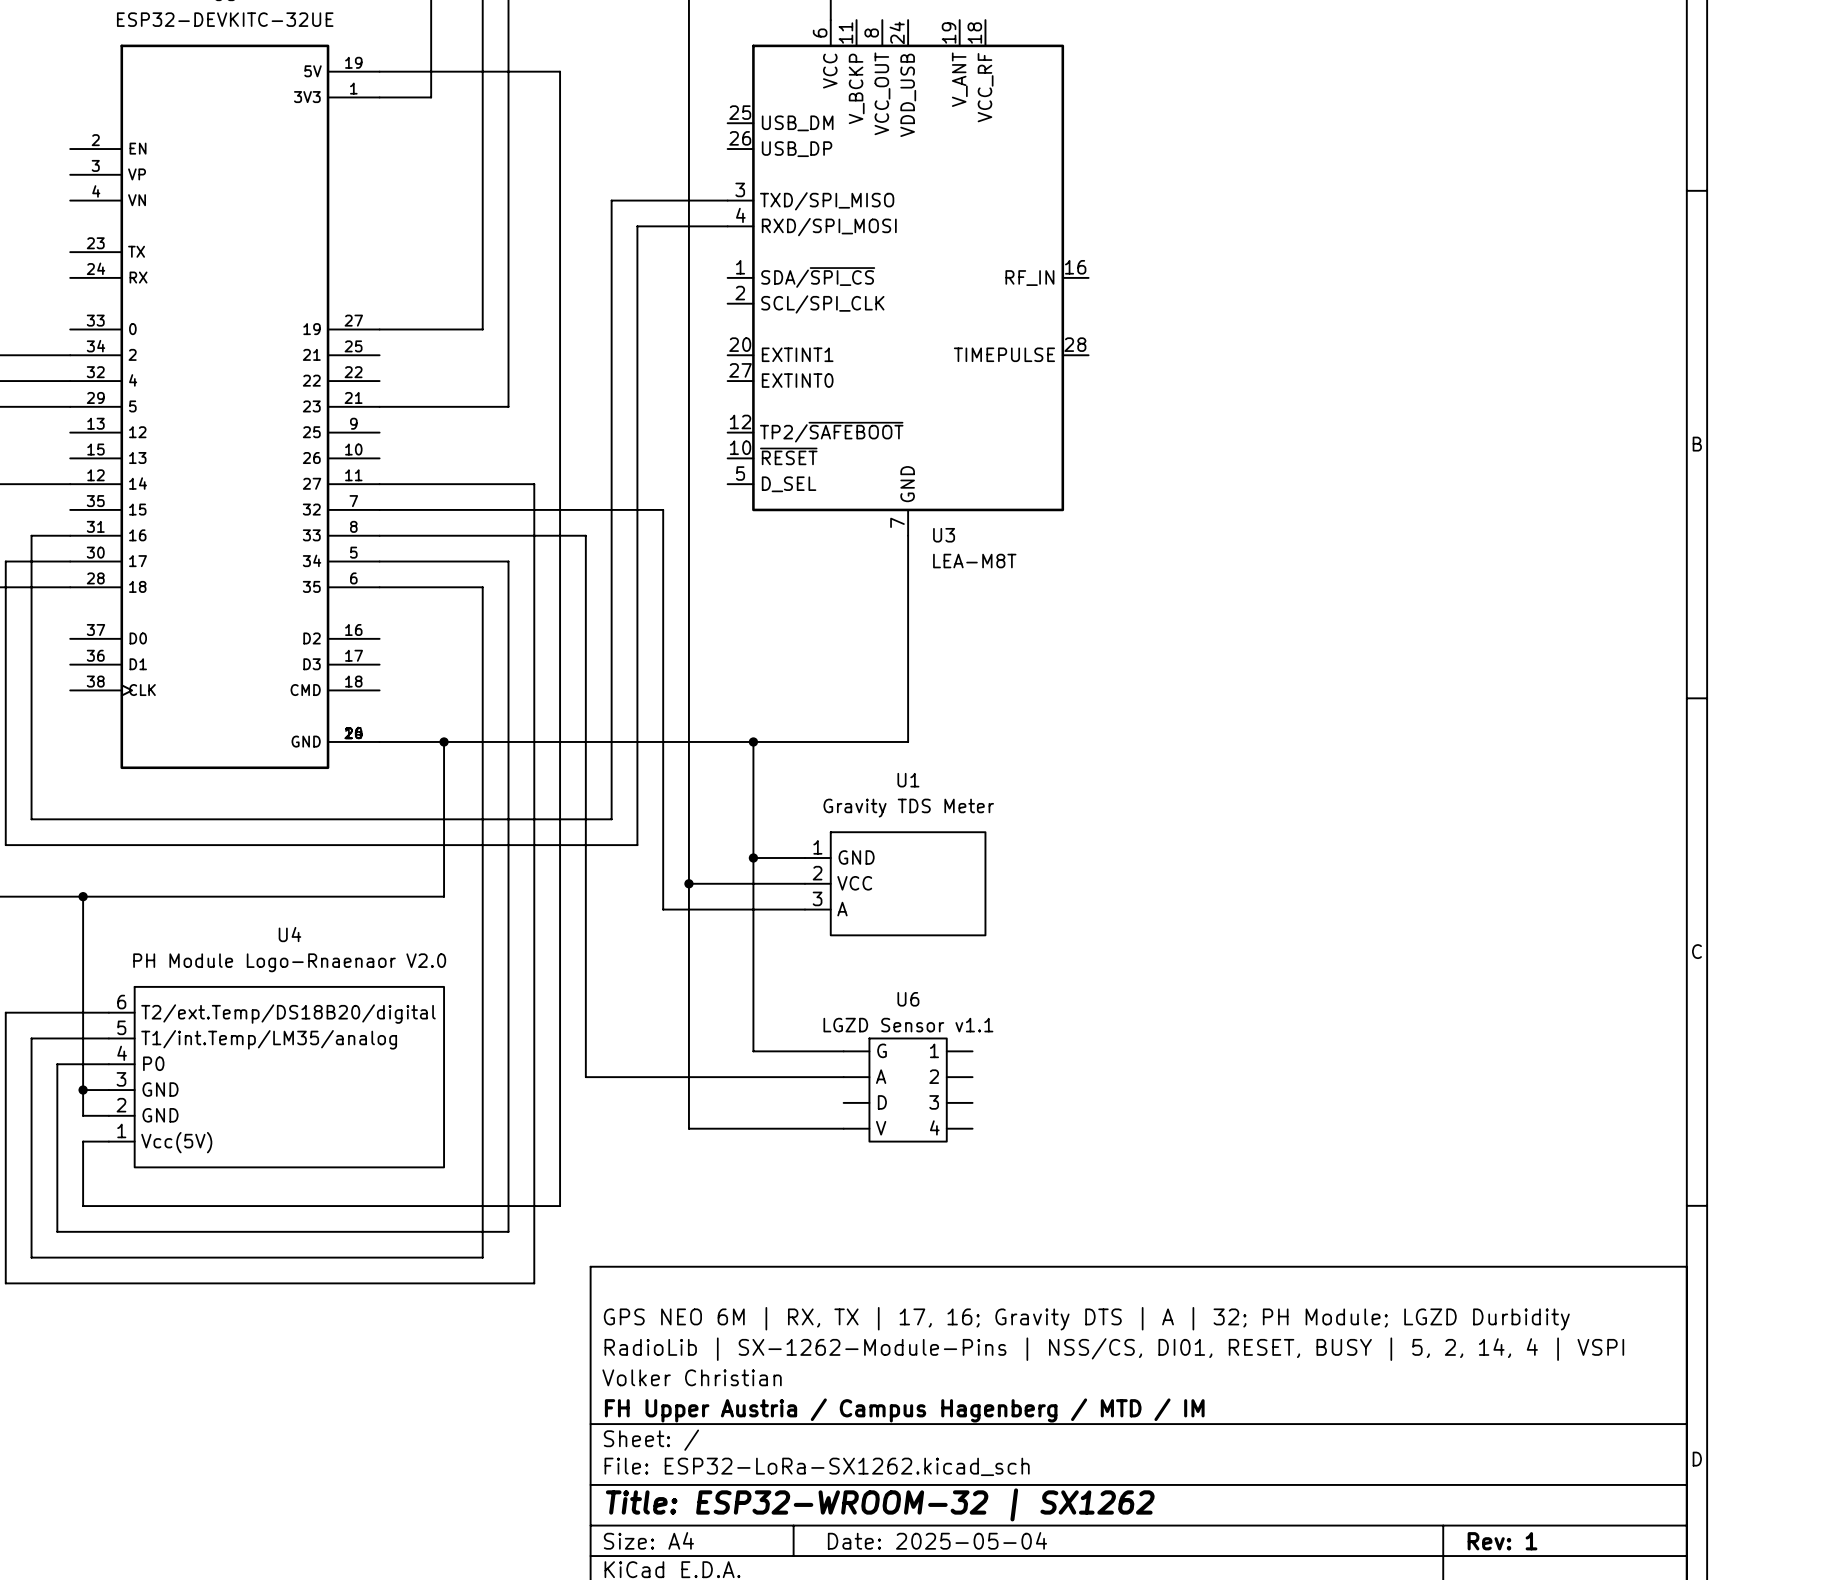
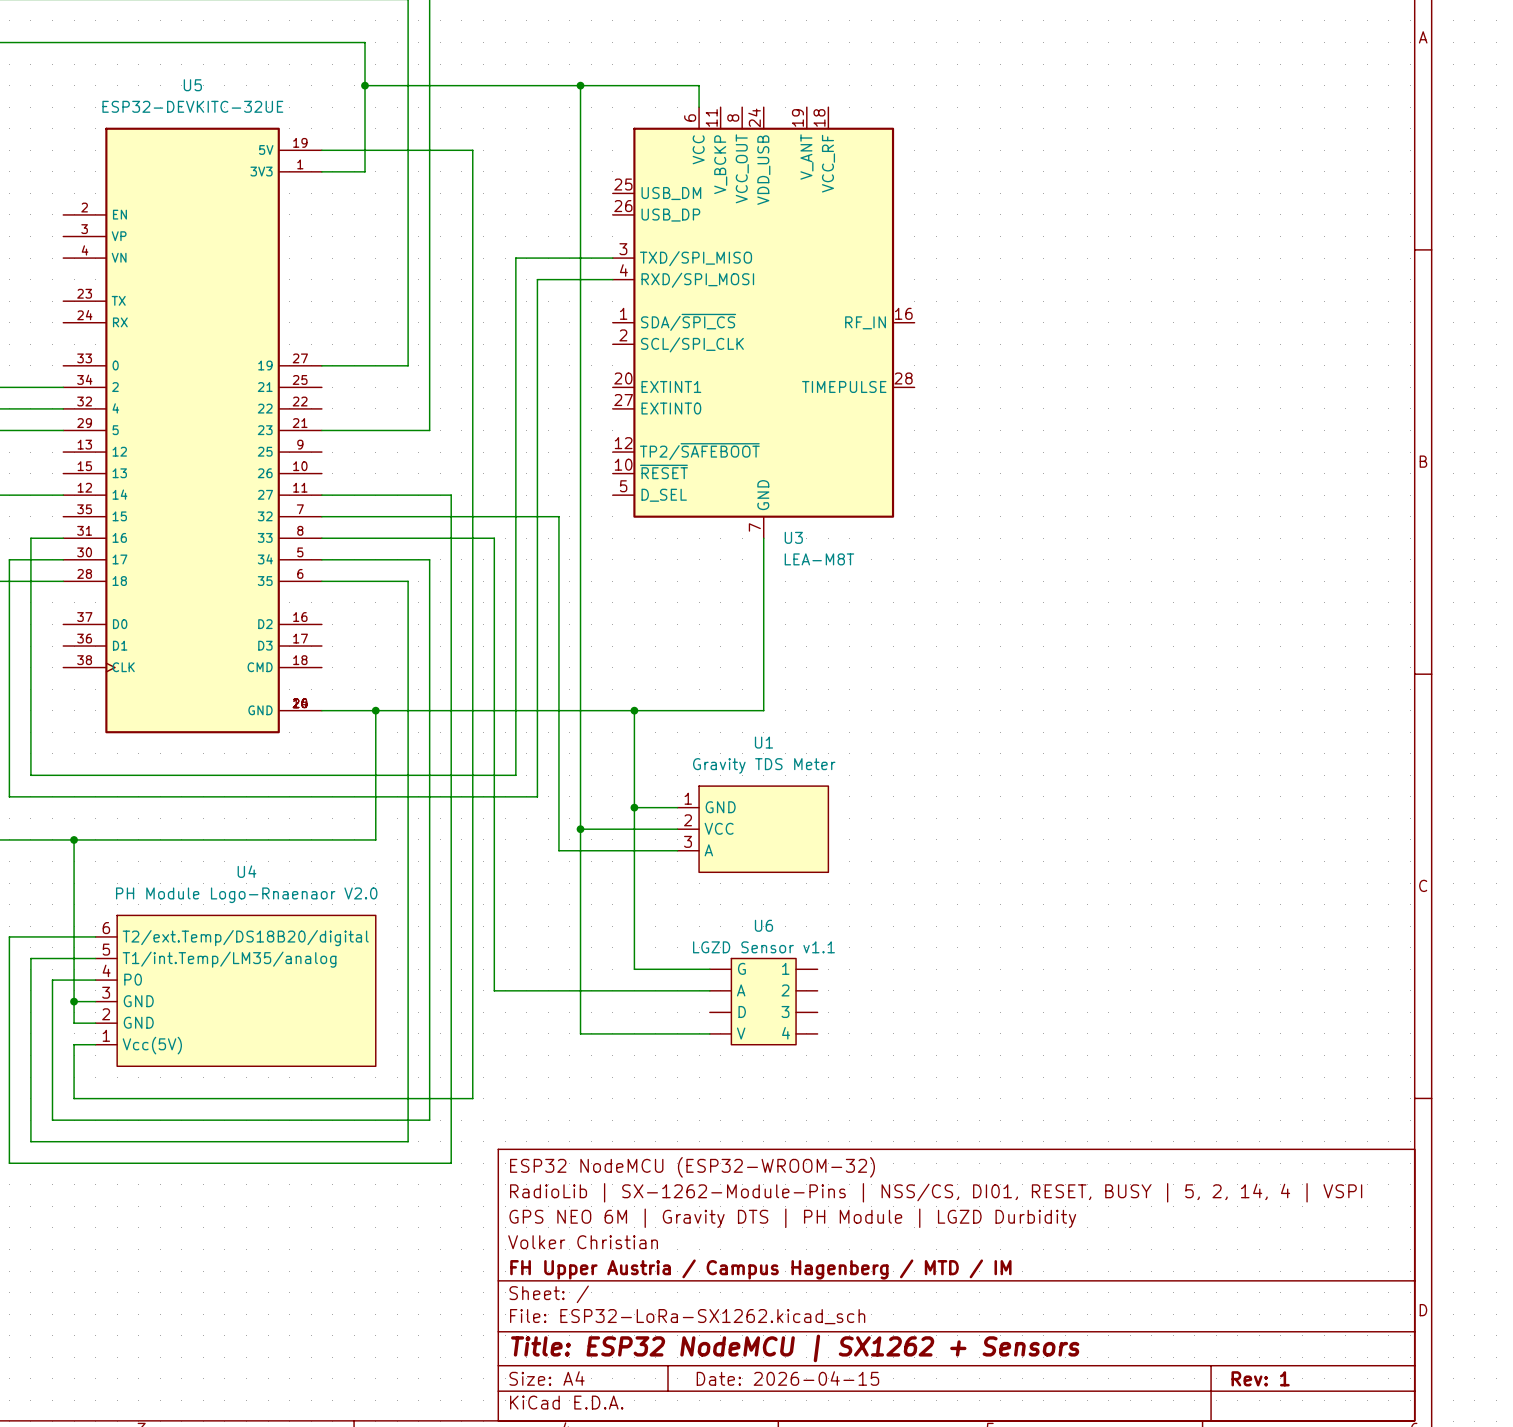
title block: none -> ESP32 NodeMCU (ESP32-WROOM-32) (692, 1167)
title block: GPS NEO 6M | RX, TX | 17, 16; Gravity DTS | A | 32; PH Module; LGZD Durbidity (1086, 1318) -> RadioLib | SX-1262-Module-Pins | NSS/CS, DI01, RESET, BUSY | 5, 2, 14, 4 | VSPI (936, 1192)
title block: RadioLib | SX-1262-Module-Pins | NSS/CS, DI01, RESET, BUSY | 5, 2, 14, 4 | VSPI (1114, 1349) -> GPS NEO 6M | Gravity DTS | PH Module | LGZD Durbidity (792, 1218)
title block: Title: ESP32-WROOM-32 | SX1262 (880, 1504) -> Title: ESP32 NodeMCU | SX1262 + Sensors (795, 1348)
title block: Date: 2025-05-04 (937, 1540) -> Date: 2026-04-15 (787, 1378)

